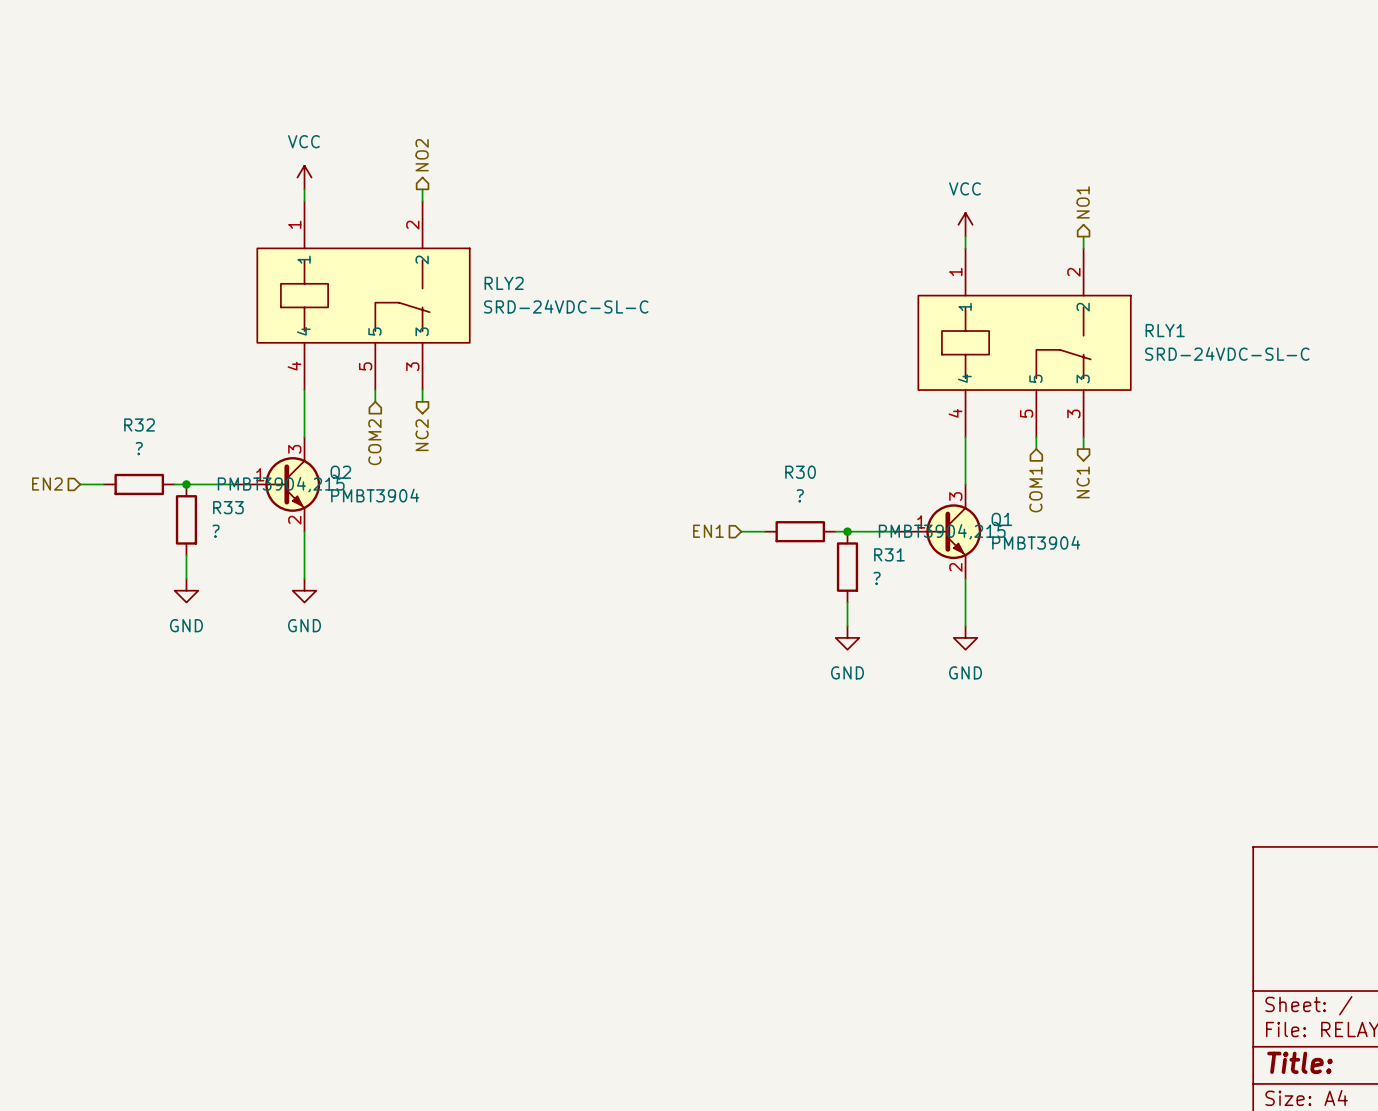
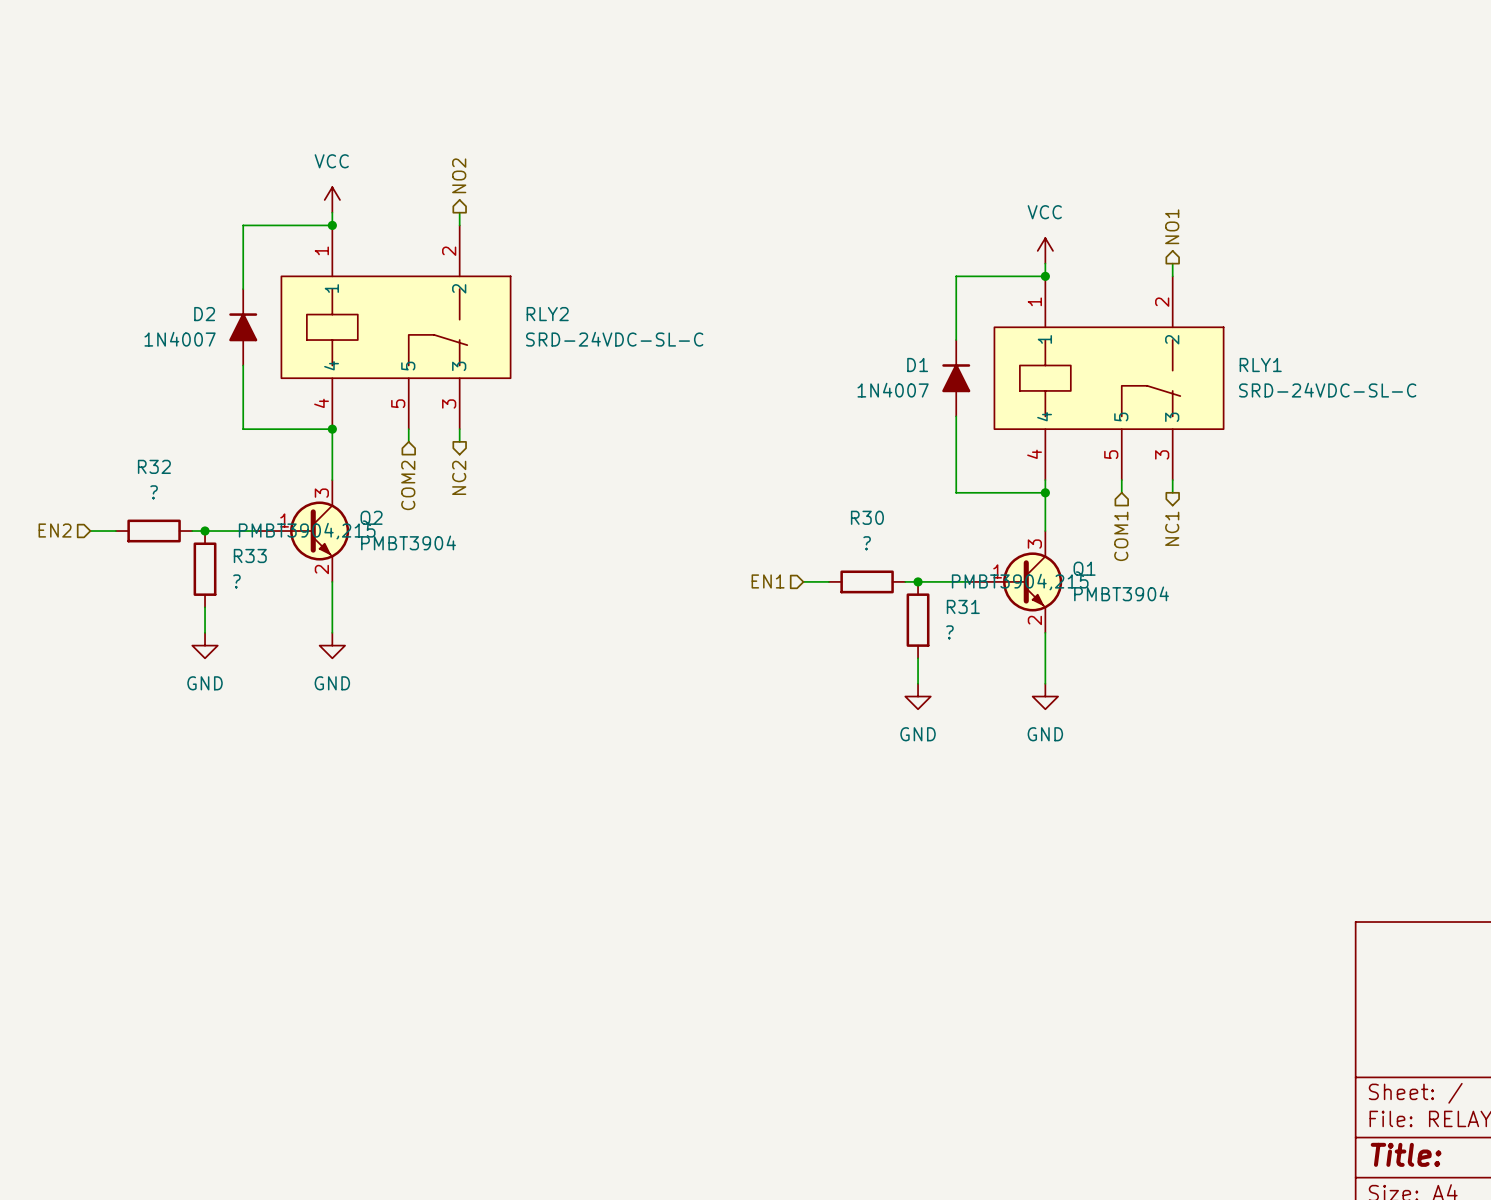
wire: none -> (332, 225) (243, 225) (243, 289)
junction: none -> (332, 225)
wire: none -> (1045, 276) (956, 276) (956, 340)
junction: none -> (1045, 276)
D2: none -> 1N4007 (243, 327)
wire: none -> (243, 365) (243, 429) (332, 429)
D1: none -> 1N4007 (956, 378)
wire: none -> (956, 416) (956, 492) (1045, 492)
junction: none -> (332, 429)
junction: none -> (1045, 492)

